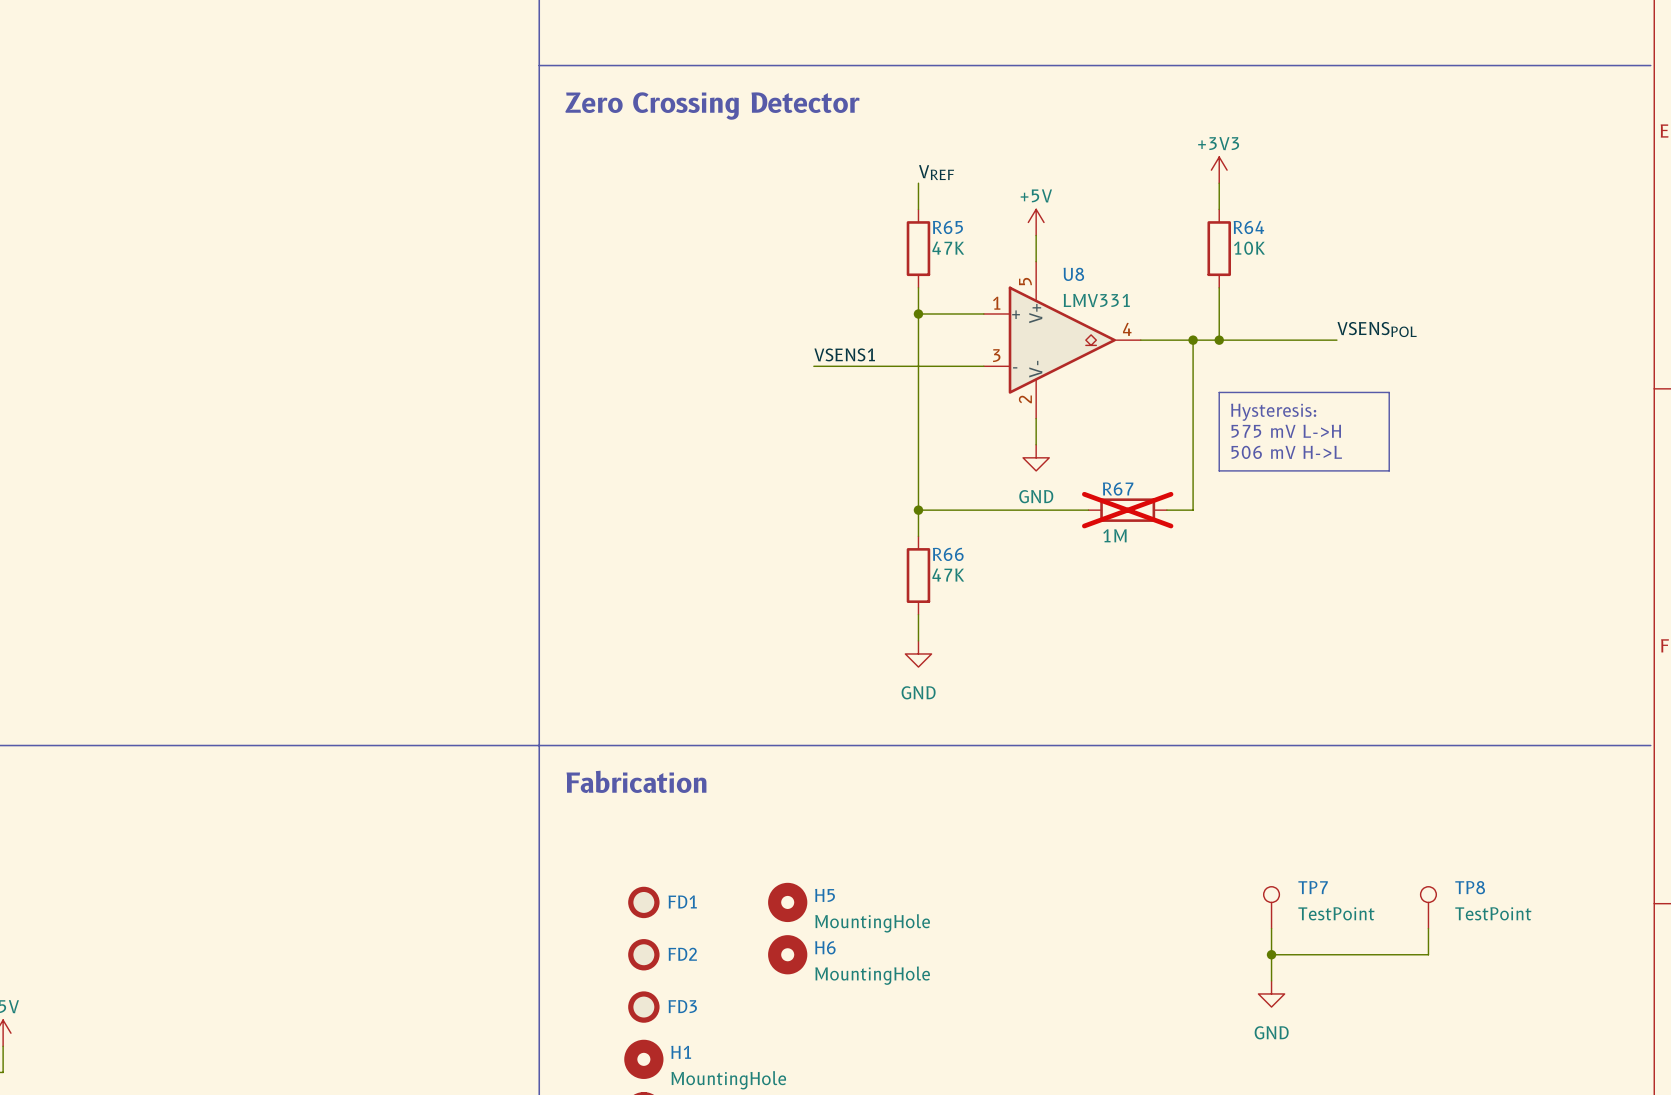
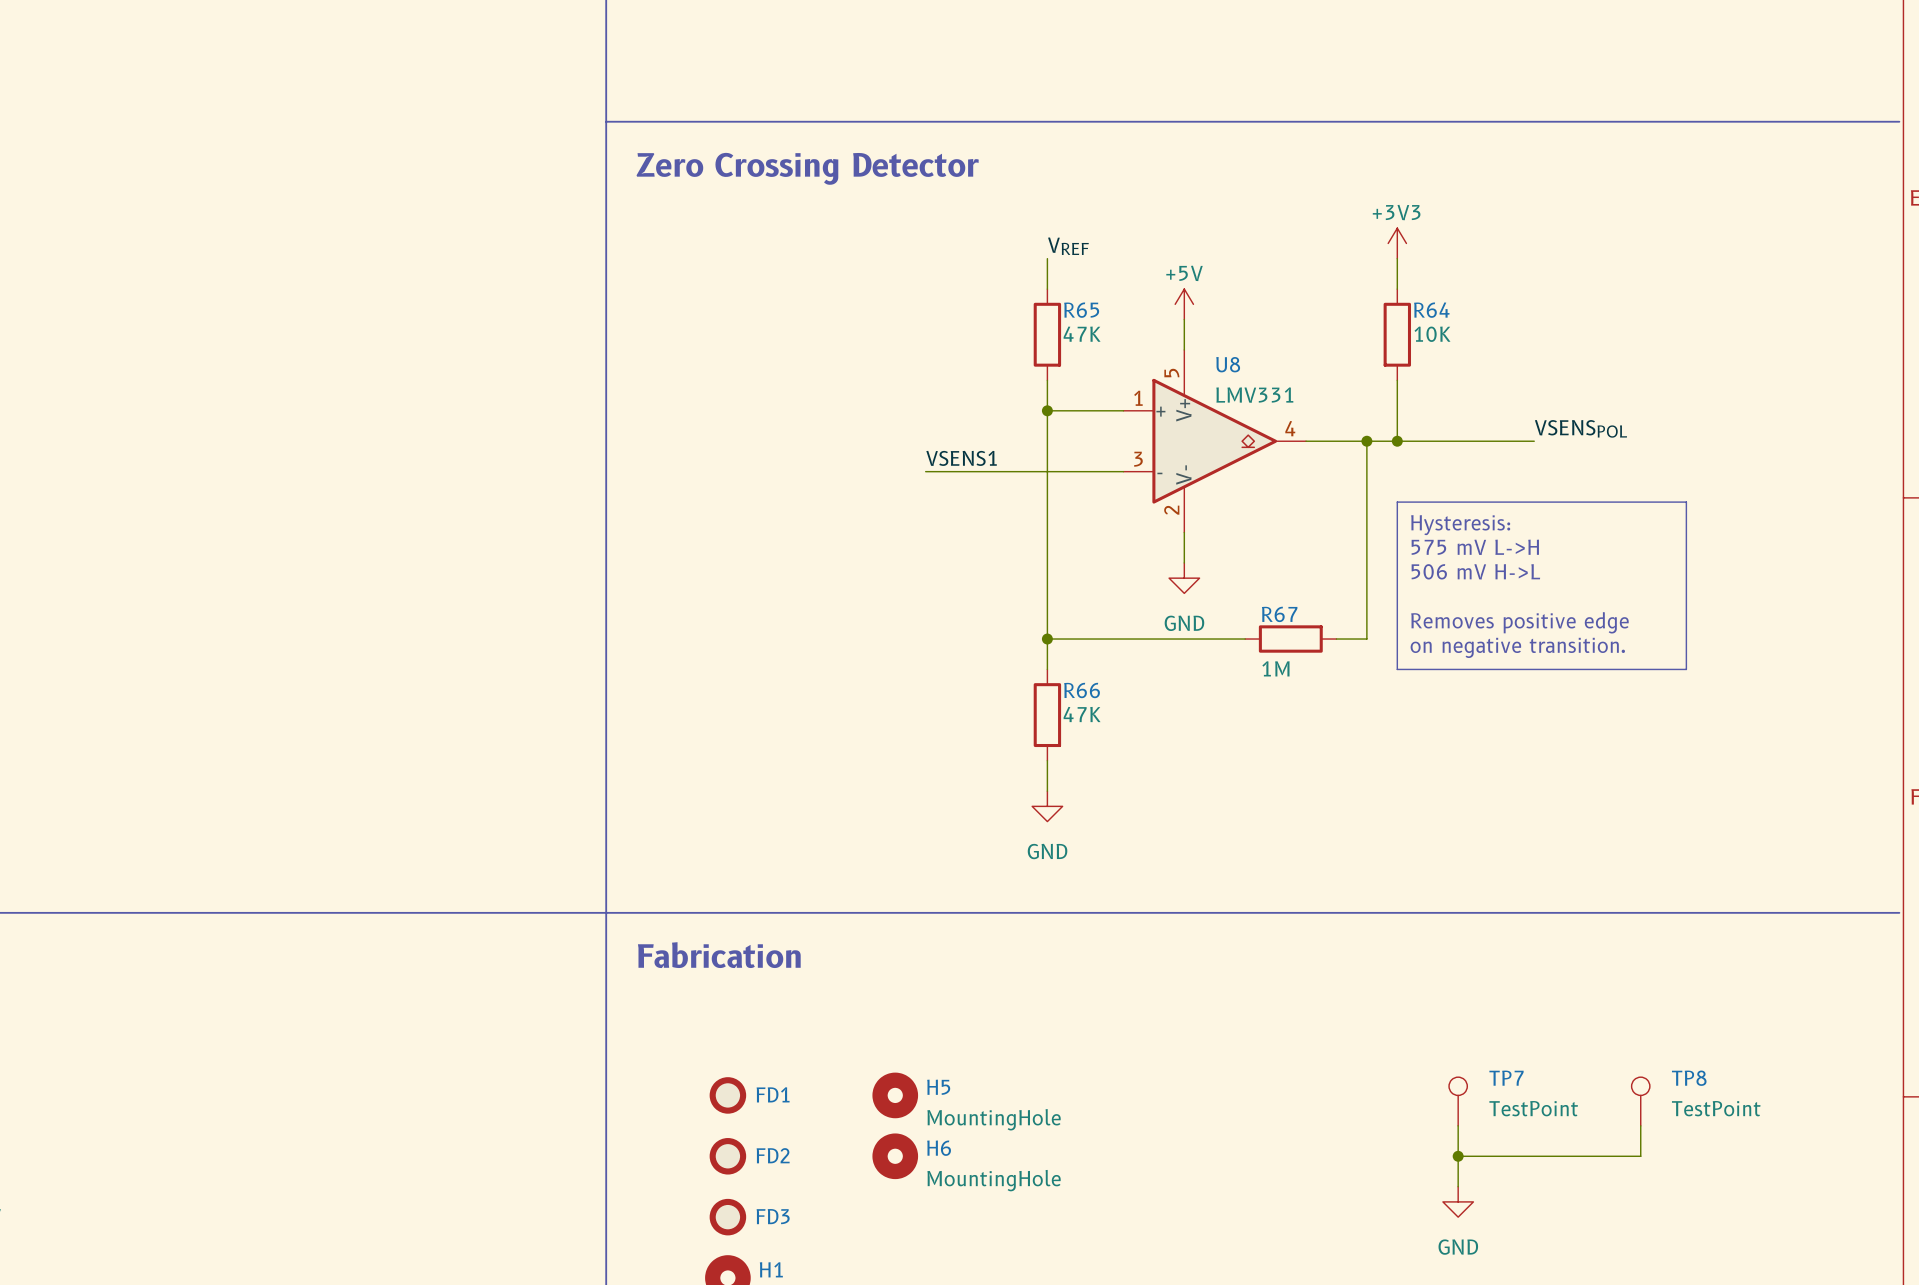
line: (1389, 392) (1389, 470) (1219, 470) -> (1595, 502) (1686, 502) (1686, 669) (1397, 669) (1397, 593)
text: none -> Removes positive edge (1519, 622)
R67 do-not-place cross: (1127, 510) -> none
text: none -> on negative transition. (1517, 647)

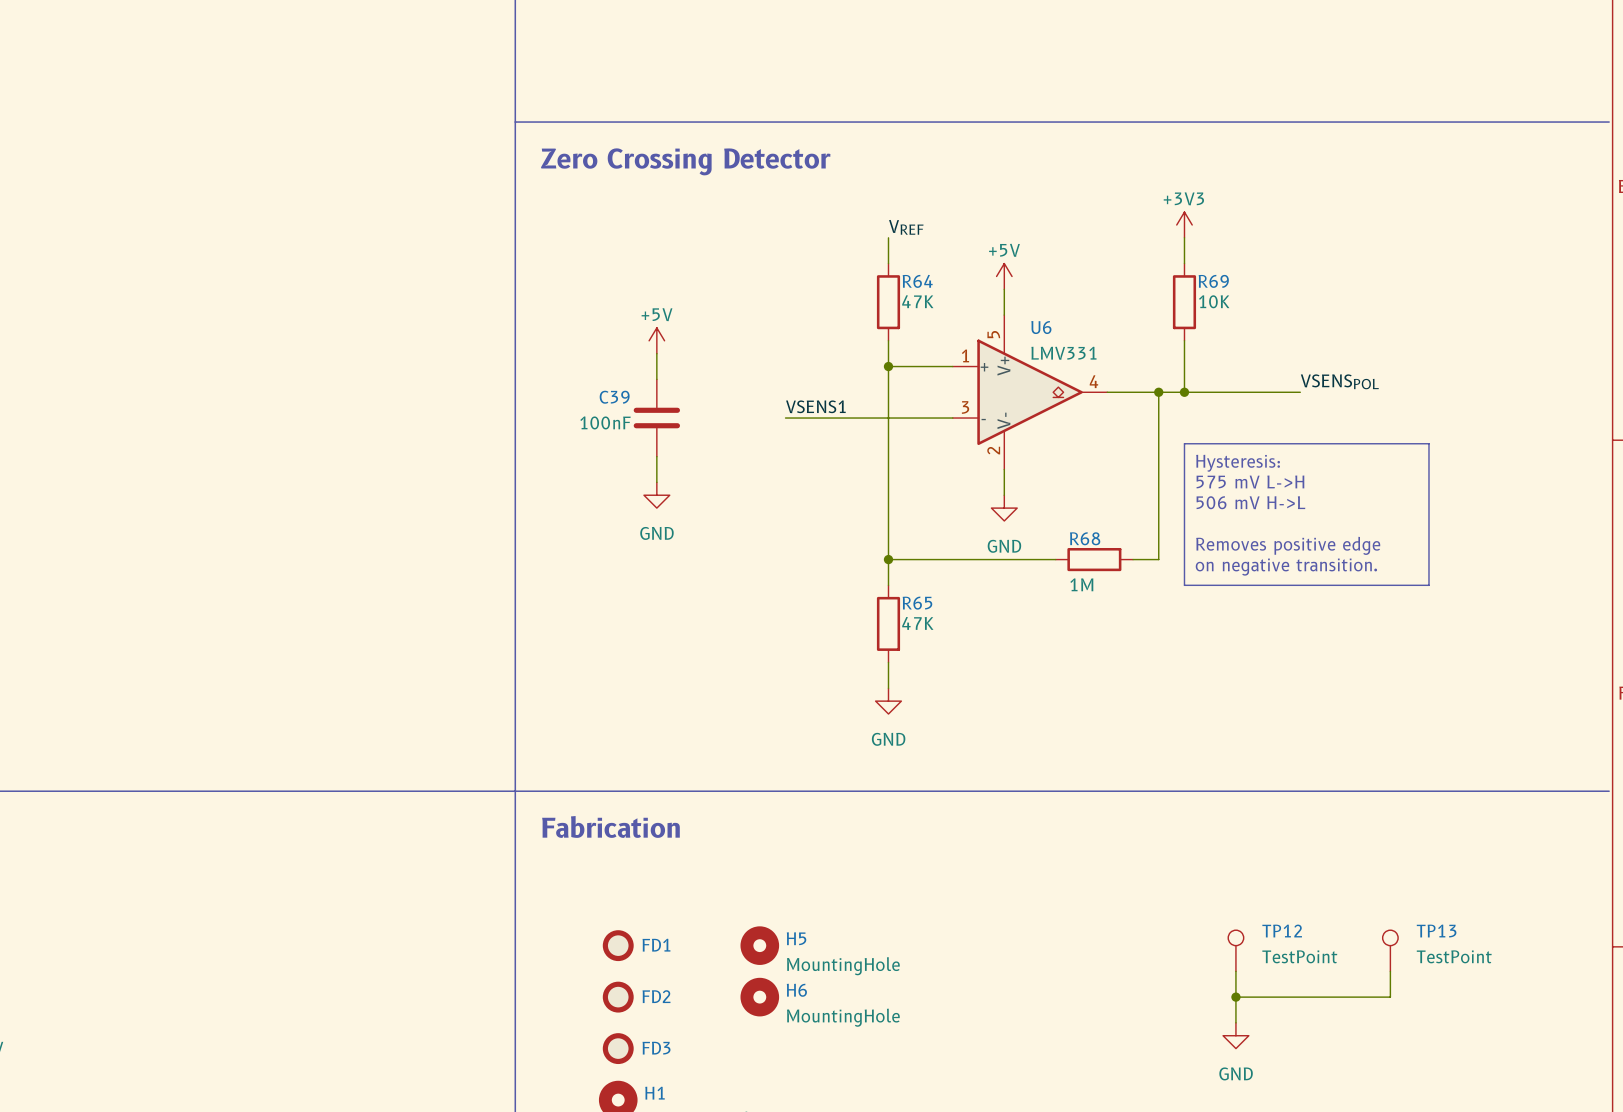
R65 name: R65 (1081, 310) -> R64 (917, 281)
R64 name: R64 (1431, 310) -> R69 (1213, 281)
U8 name: U8 (1228, 364) -> U6 (1041, 327)
power symbol: none -> +5V (656, 340)
wire: none -> (656, 353) (656, 379)
C39: none -> 100nF (656, 418)
wire: none -> (656, 456) (656, 482)
power symbol: none -> GND (656, 495)
R67 name: R67 (1279, 614) -> R68 (1085, 538)
R66 name: R66 (1082, 690) -> R65 (917, 603)
TP7 name: TP7 (1506, 1078) -> TP12 (1282, 931)
TP8 name: TP8 (1689, 1078) -> TP13 (1436, 931)

